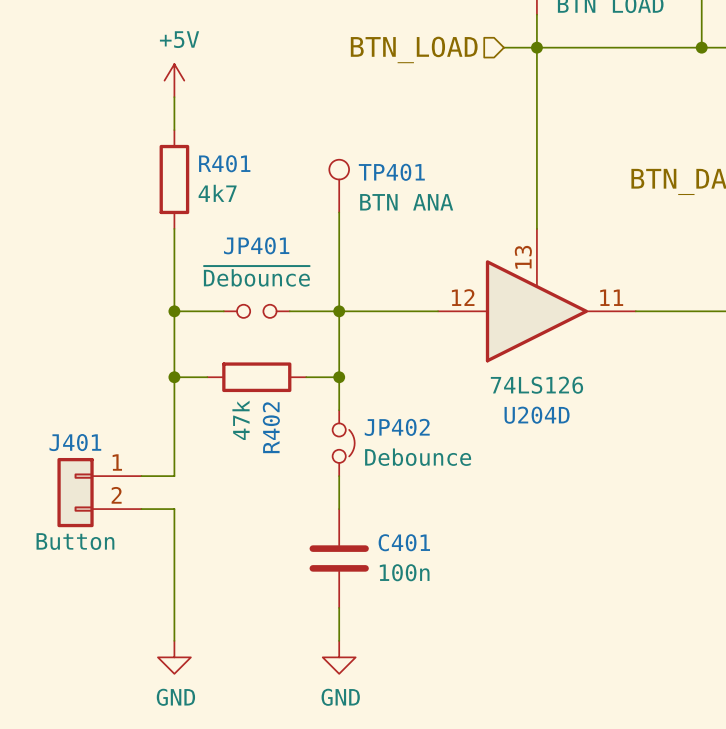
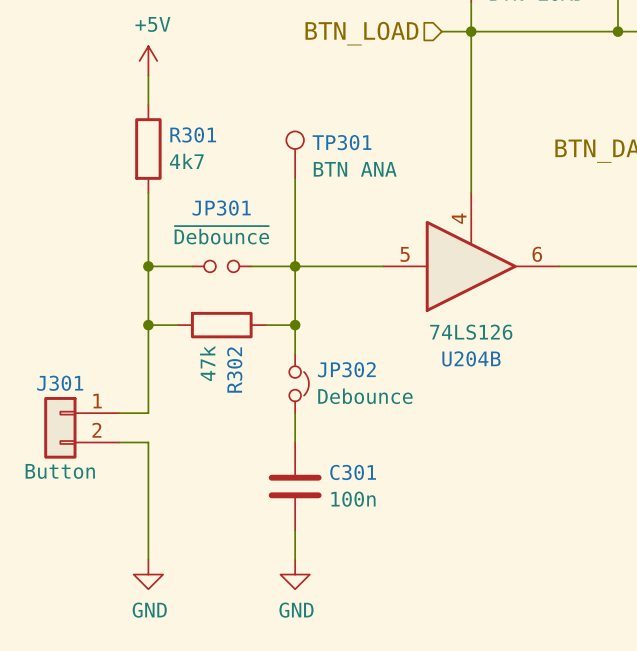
R401 name: R401 (224, 163) -> R301 (193, 134)
TP401 name: TP401 (391, 172) -> TP301 (342, 142)
JP401 name: JP401 (256, 245) -> JP301 (221, 208)
U204D pin number: 13 (523, 257) -> 4 (459, 218)
U204D pin number: 12 (463, 297) -> 5 (405, 254)
U204D pin number: 11 (611, 297) -> 6 (537, 254)
U204D name: U204D (537, 415) -> U204B (471, 358)
R402 name: R402 (271, 427) -> R302 (234, 370)
JP402 name: JP402 (397, 427) -> JP302 (346, 369)
J401 name: J401 (75, 442) -> J301 (60, 383)
C401 name: C401 (404, 542) -> C301 (353, 472)

